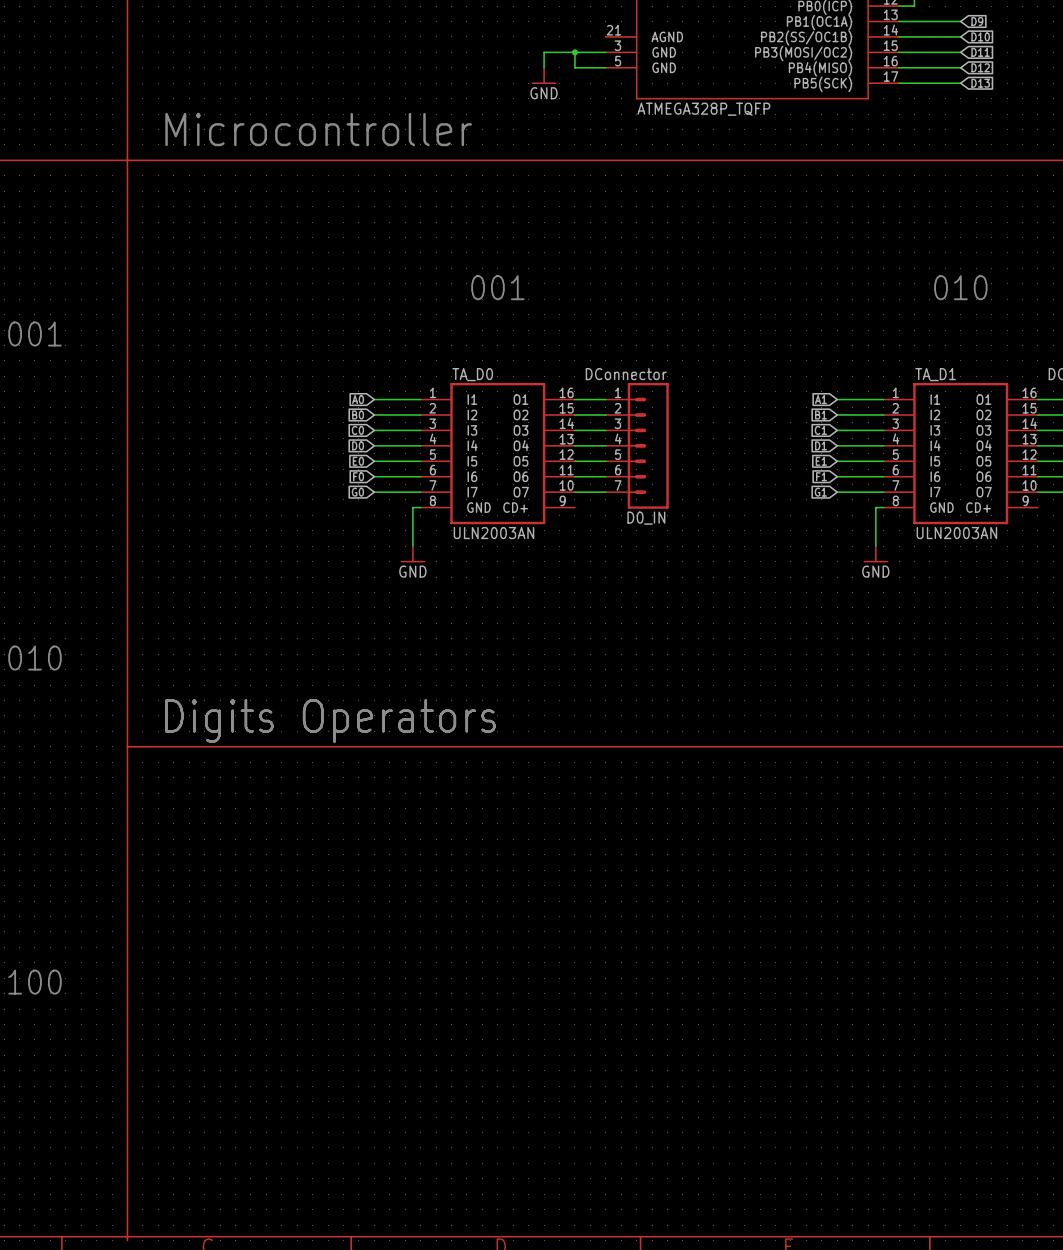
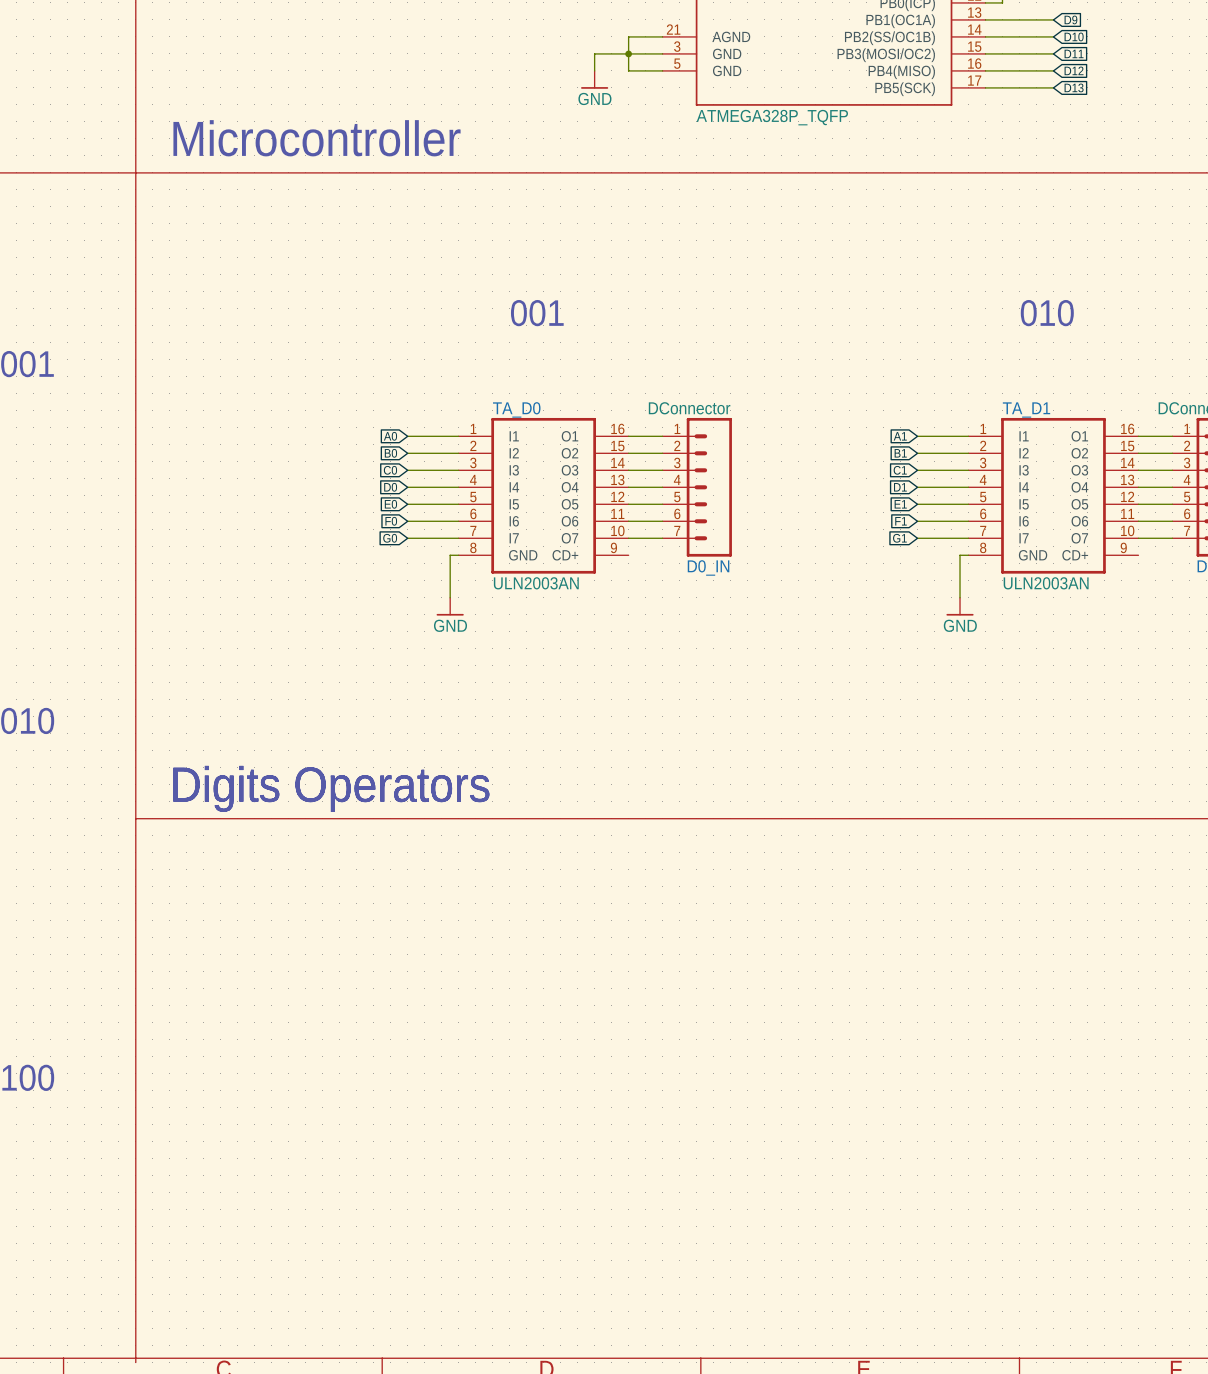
wire: none -> (662, 36) (628, 36) (628, 53)

